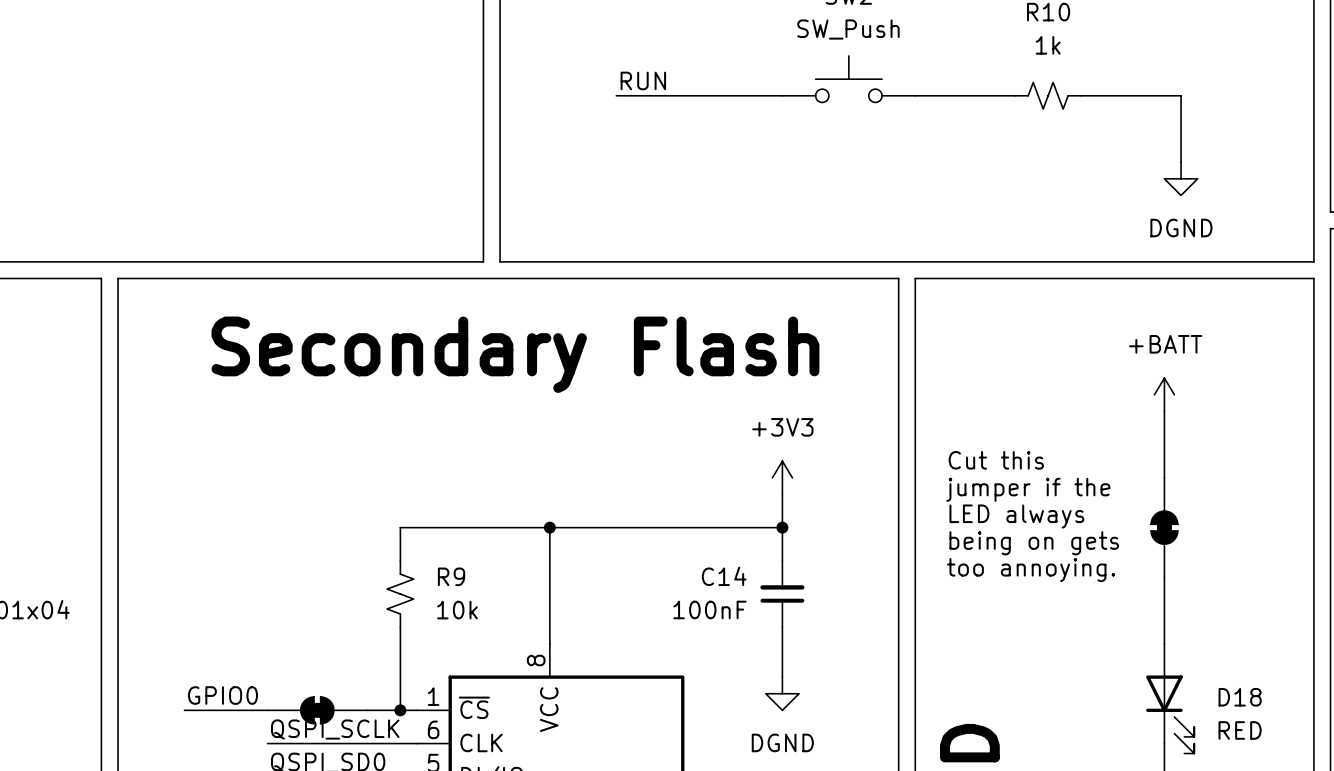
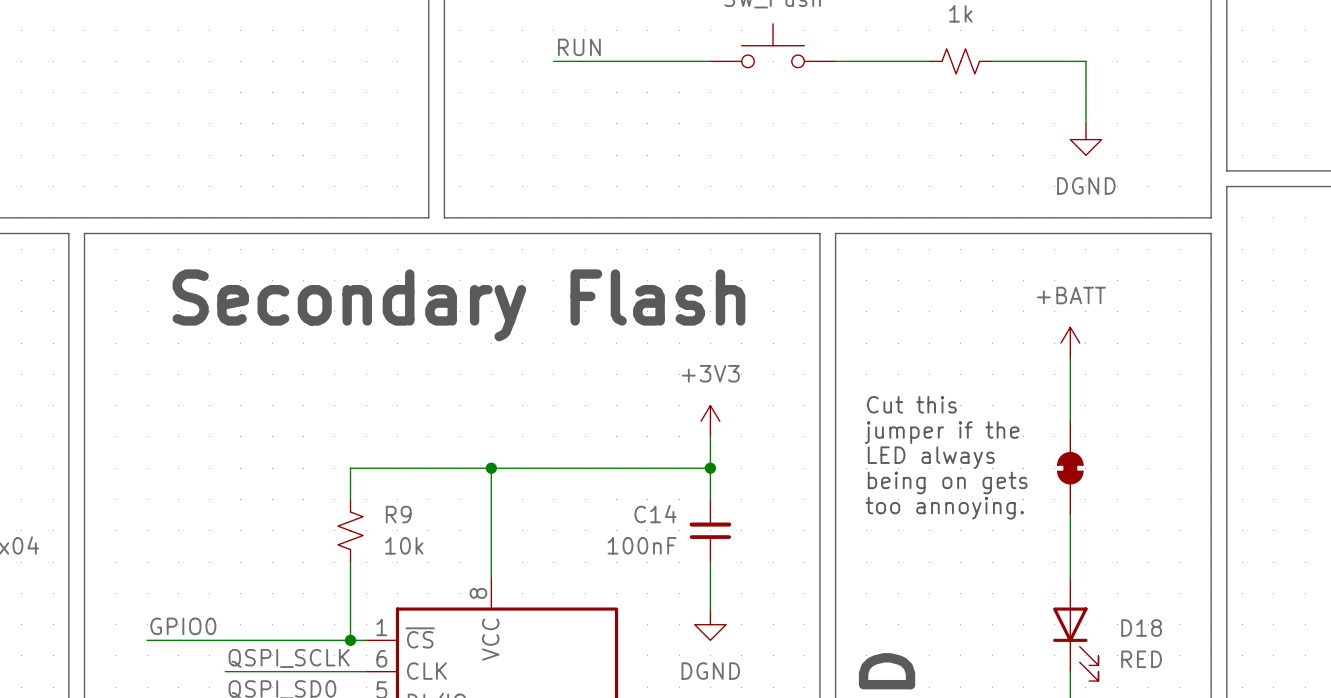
part: (317, 710) -> none

